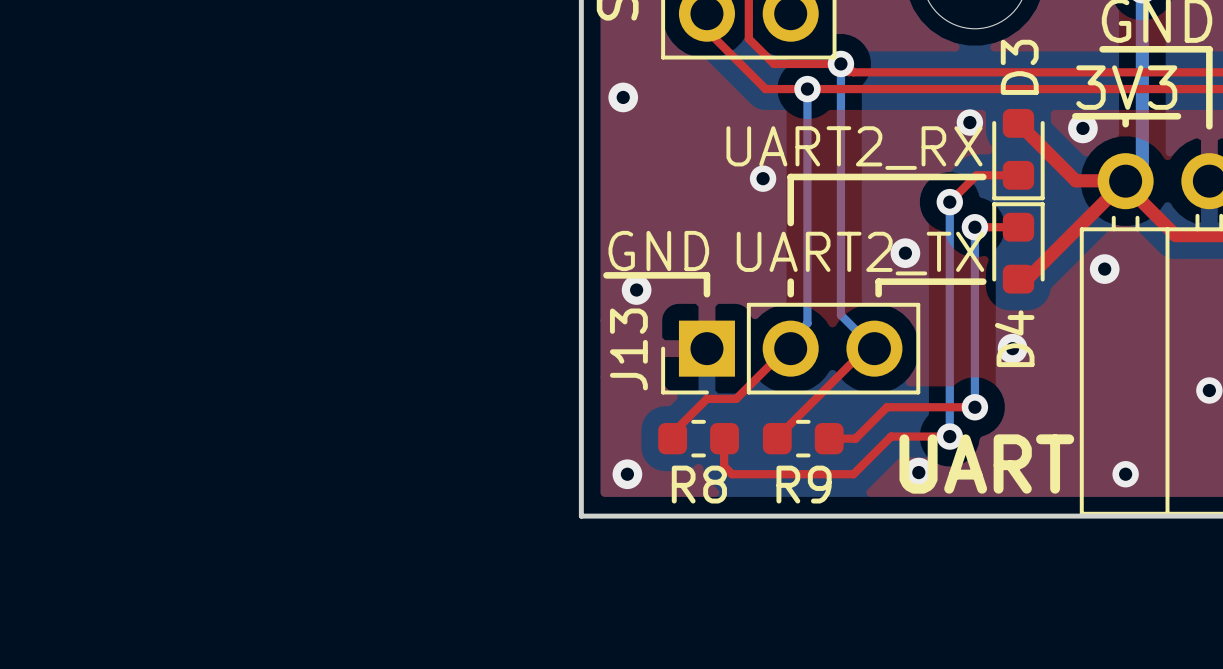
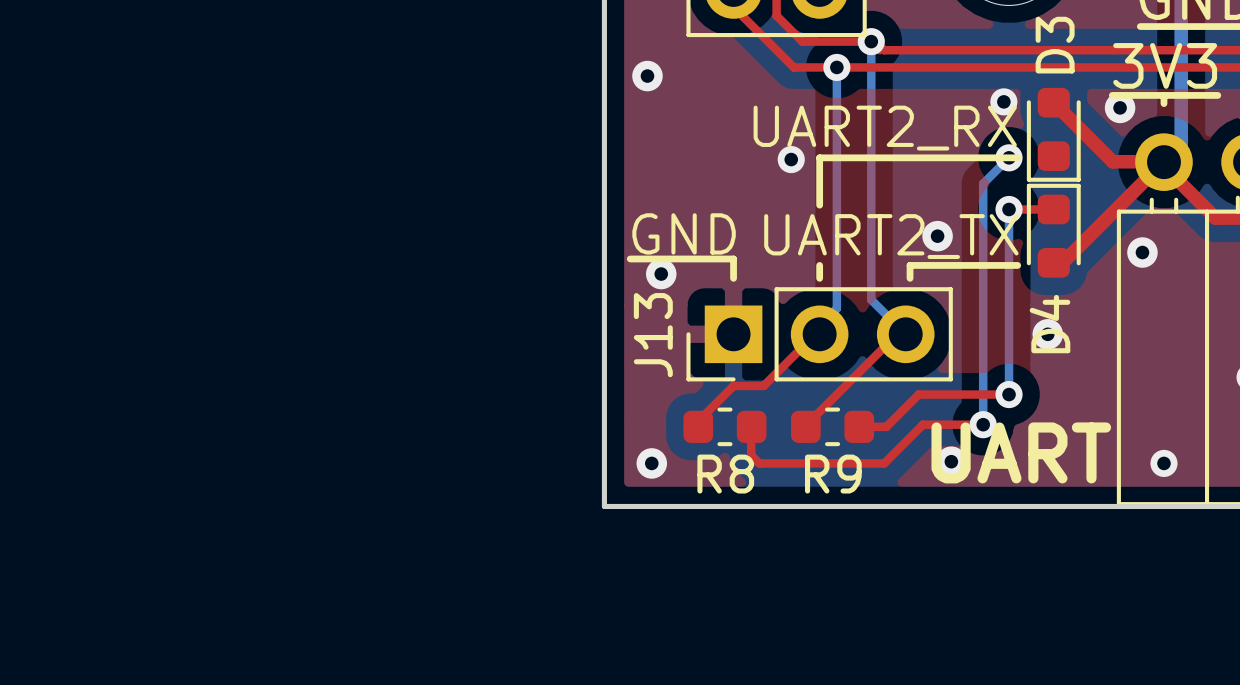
top track: (1018, 175) (976, 175) (949, 202) -> none
bottom track: none -> (1009, 157) (983, 183)
via position: (949, 202) -> (1009, 157)

